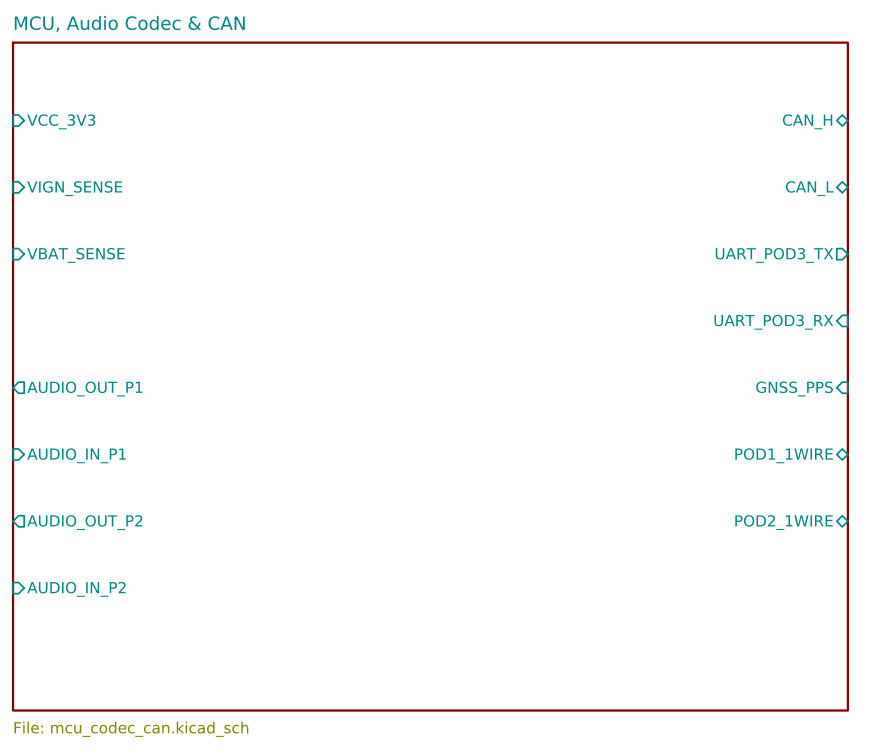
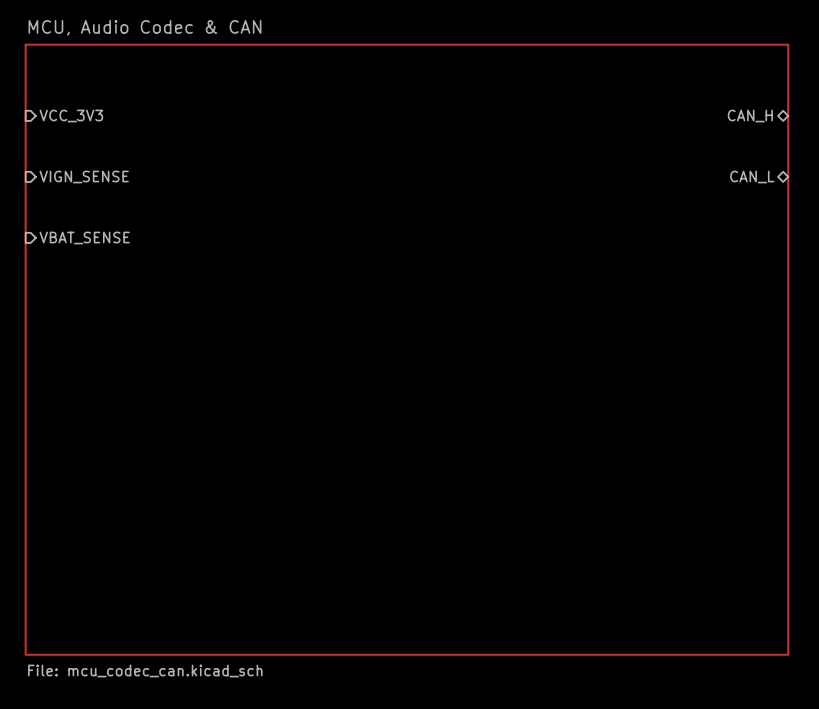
sheet pin: UART_POD3_TX (774, 255) -> none
sheet pin: UART_POD3_RX (773, 322) -> none
sheet pin: AUDIO_OUT_P1 (84, 388) -> none
sheet pin: GNSS_PPS (794, 388) -> none
sheet pin: AUDIO_IN_P1 (76, 455) -> none
sheet pin: POD1_1WIRE (784, 455) -> none
sheet pin: AUDIO_OUT_P2 (84, 522) -> none
sheet pin: POD2_1WIRE (784, 522) -> none
sheet pin: AUDIO_IN_P2 (76, 589) -> none

